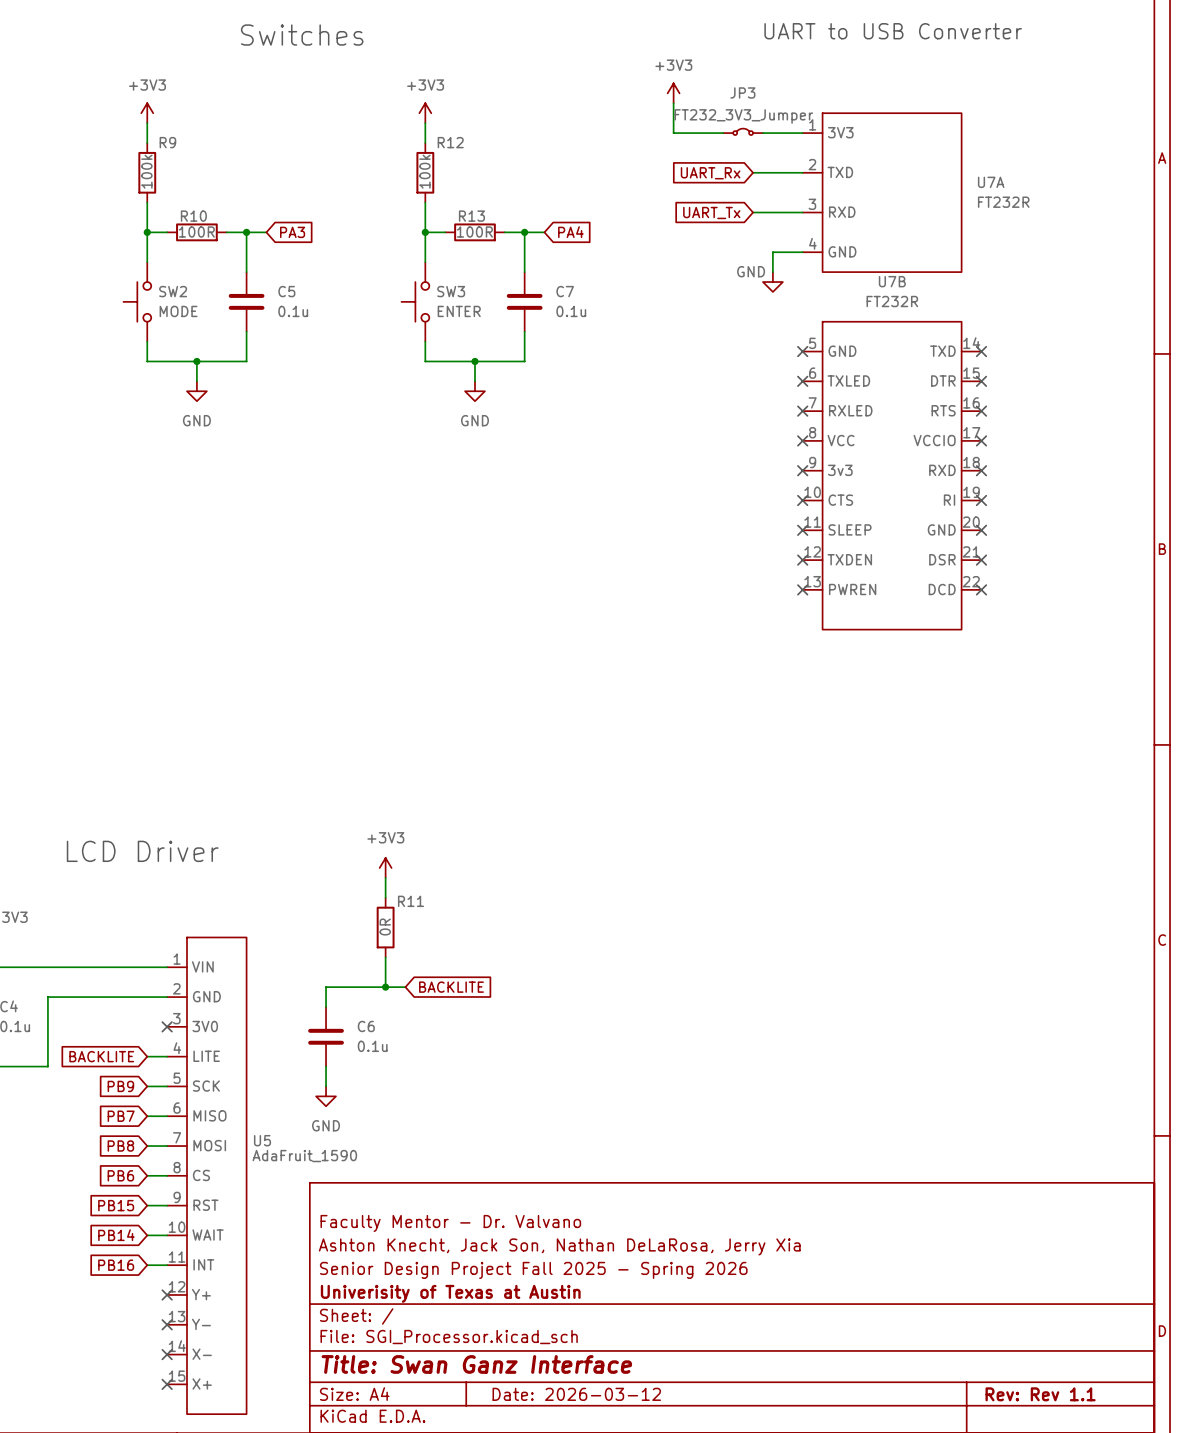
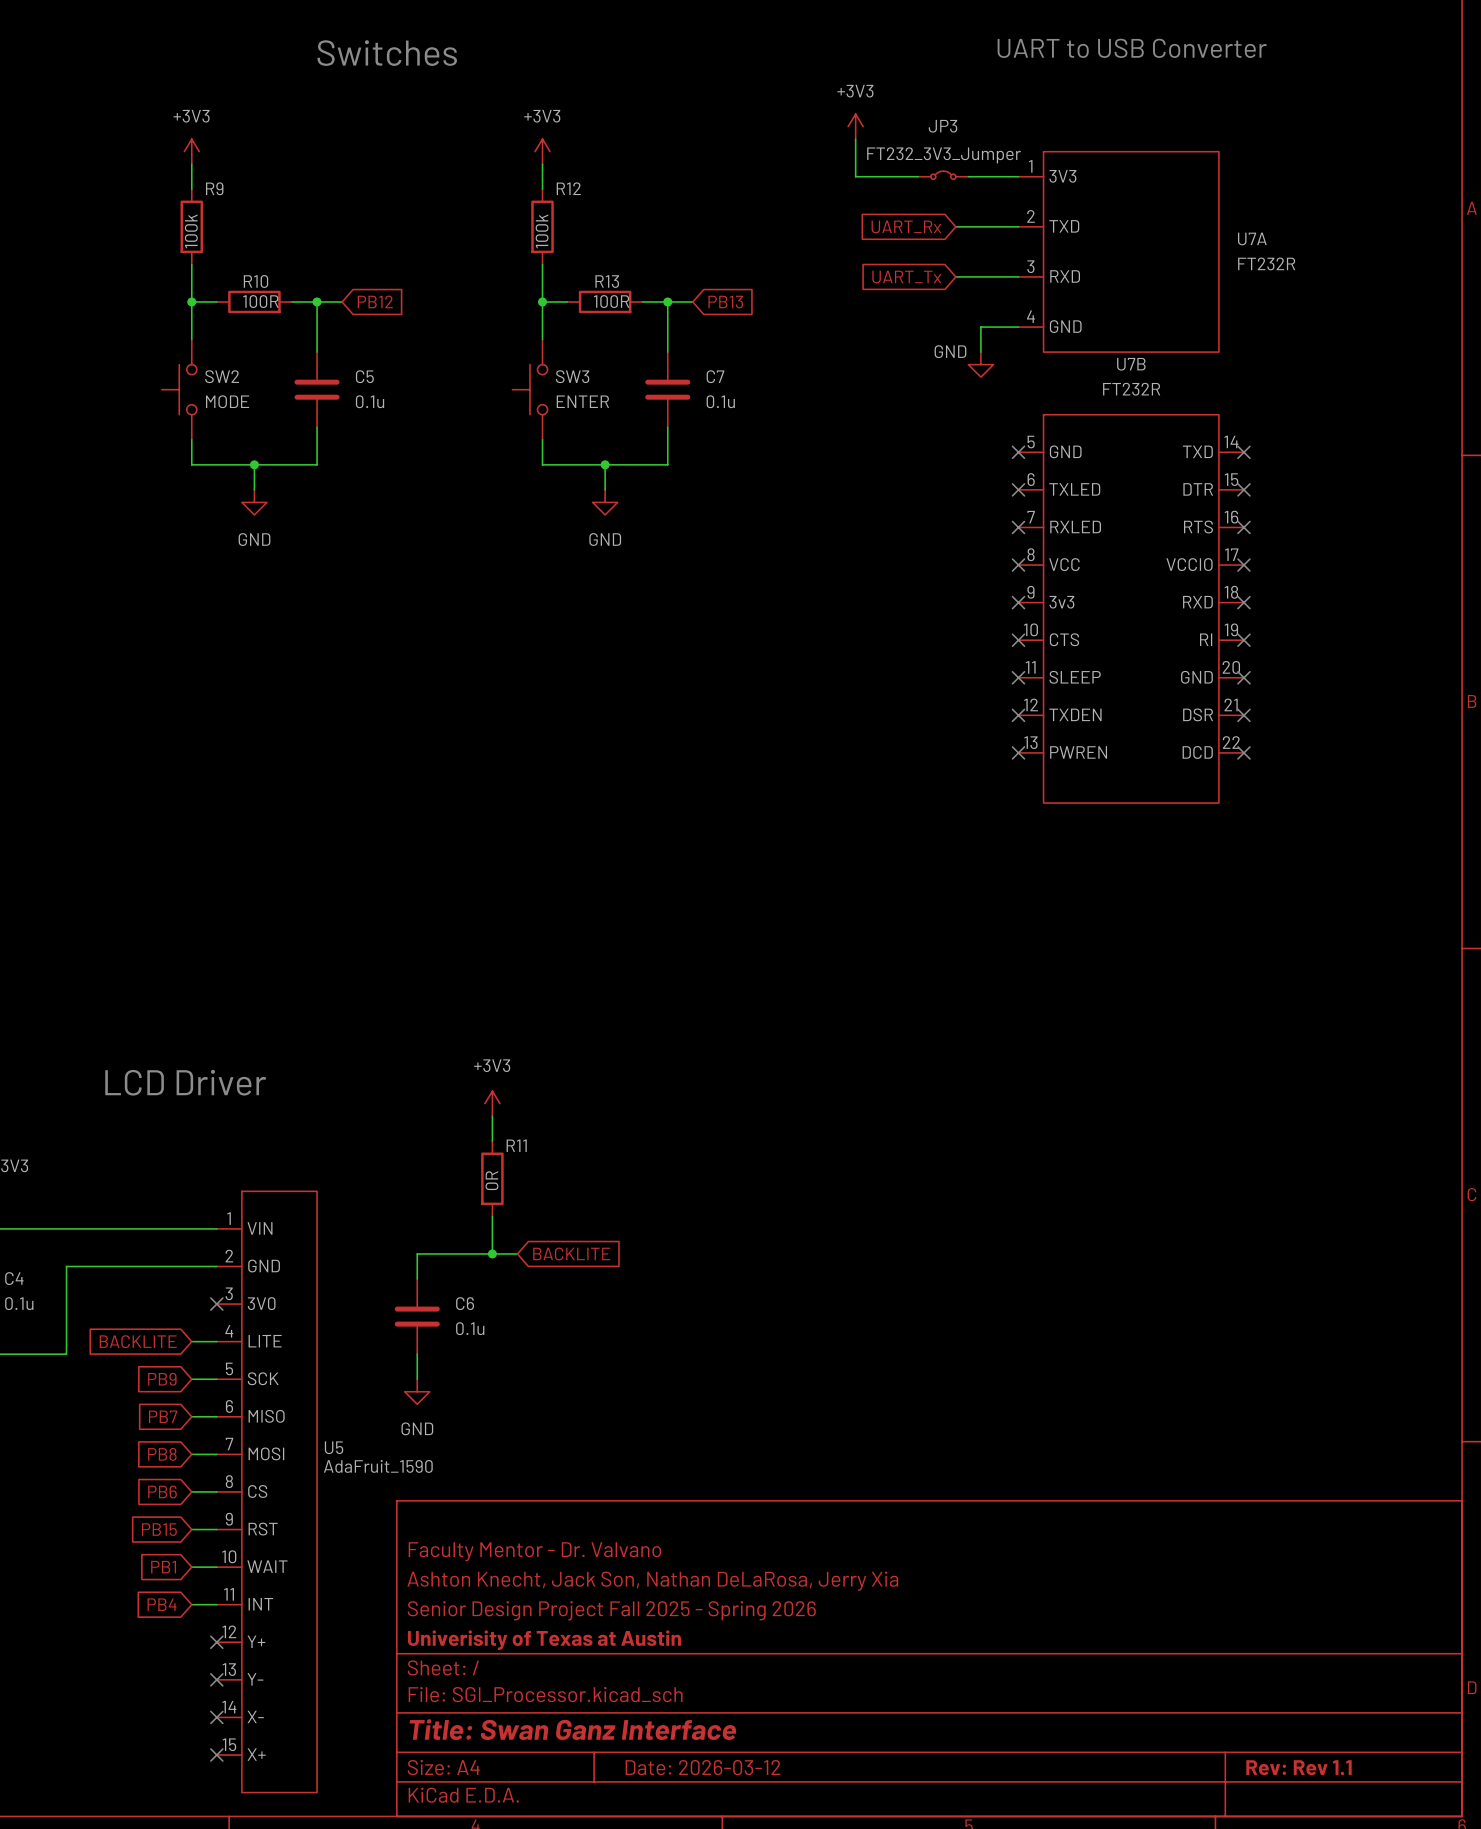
global label: PA3 (292, 232) -> PB12 (375, 301)
global label: PA4 (570, 232) -> PB13 (725, 302)
global label: PB14 (116, 1235) -> PB1 (163, 1567)
global label: PB16 (116, 1265) -> PB4 (162, 1604)

